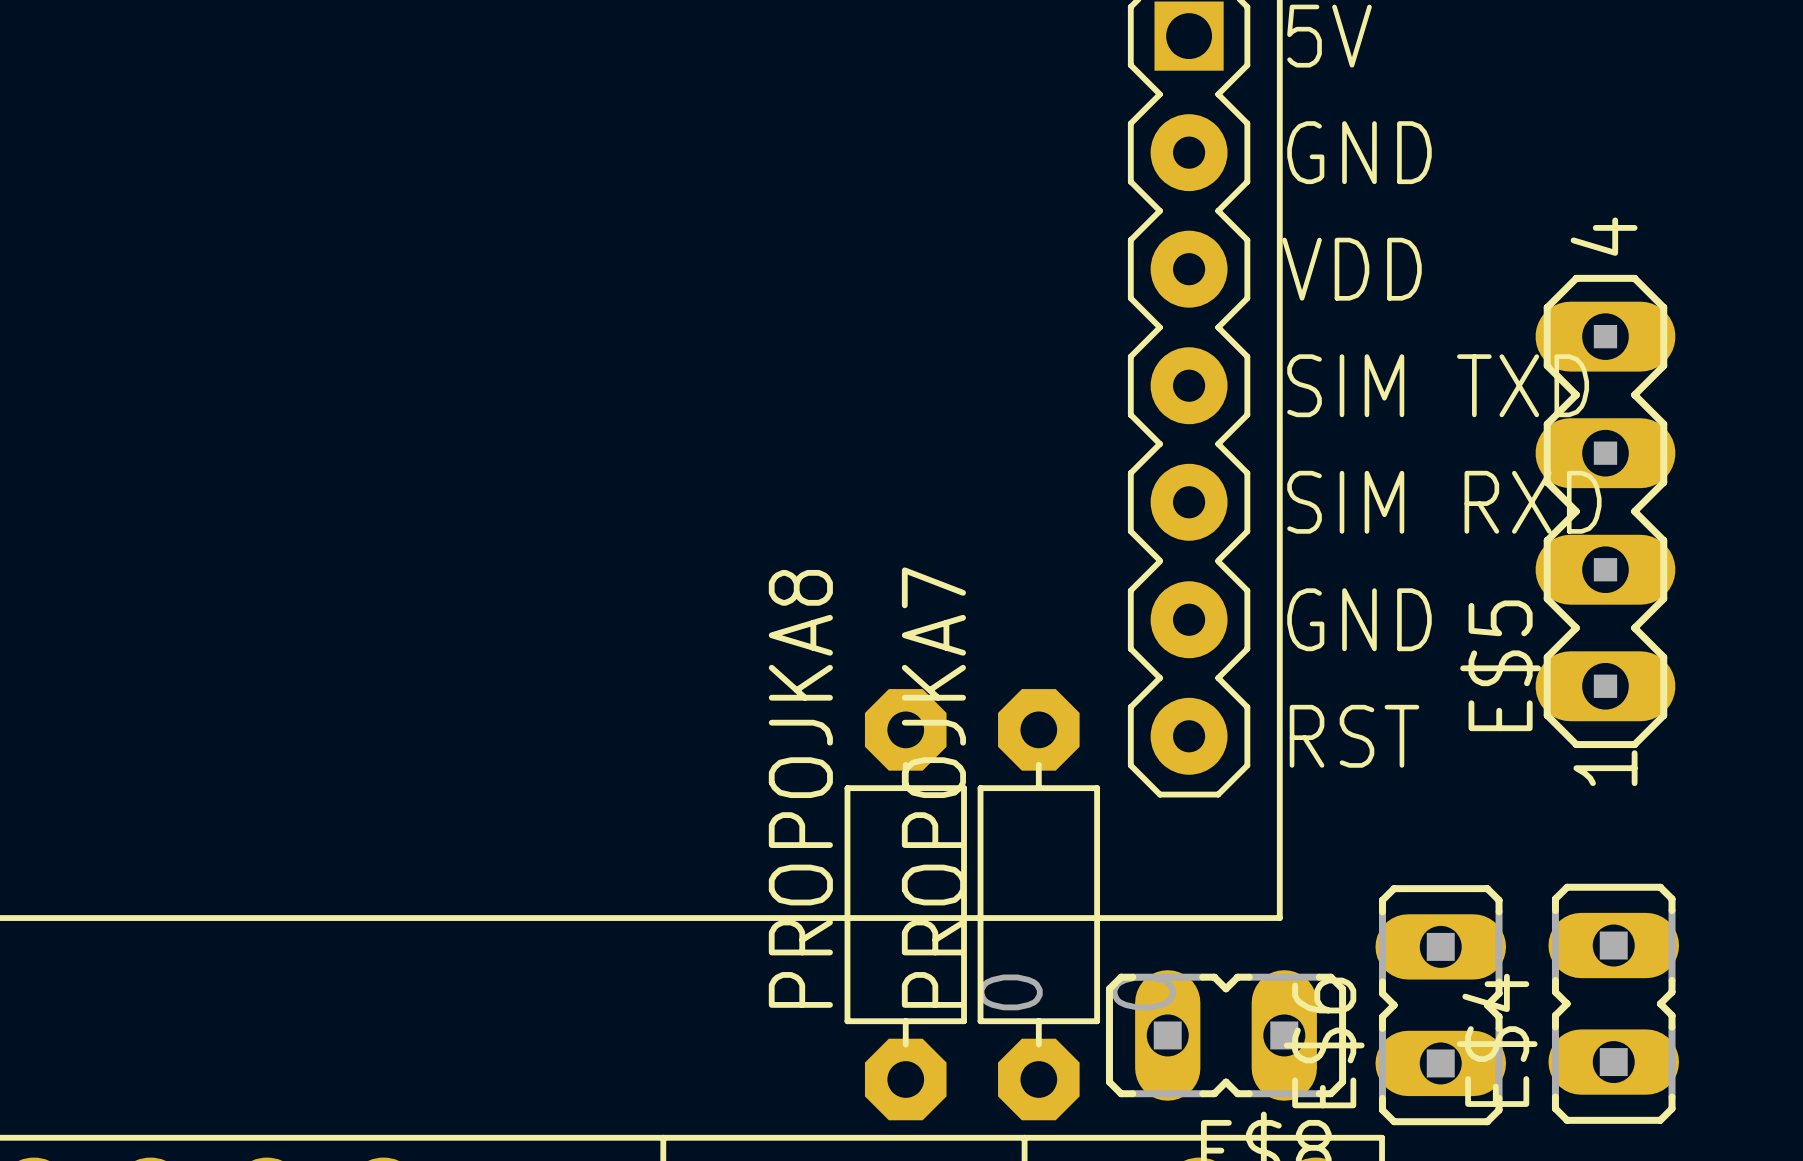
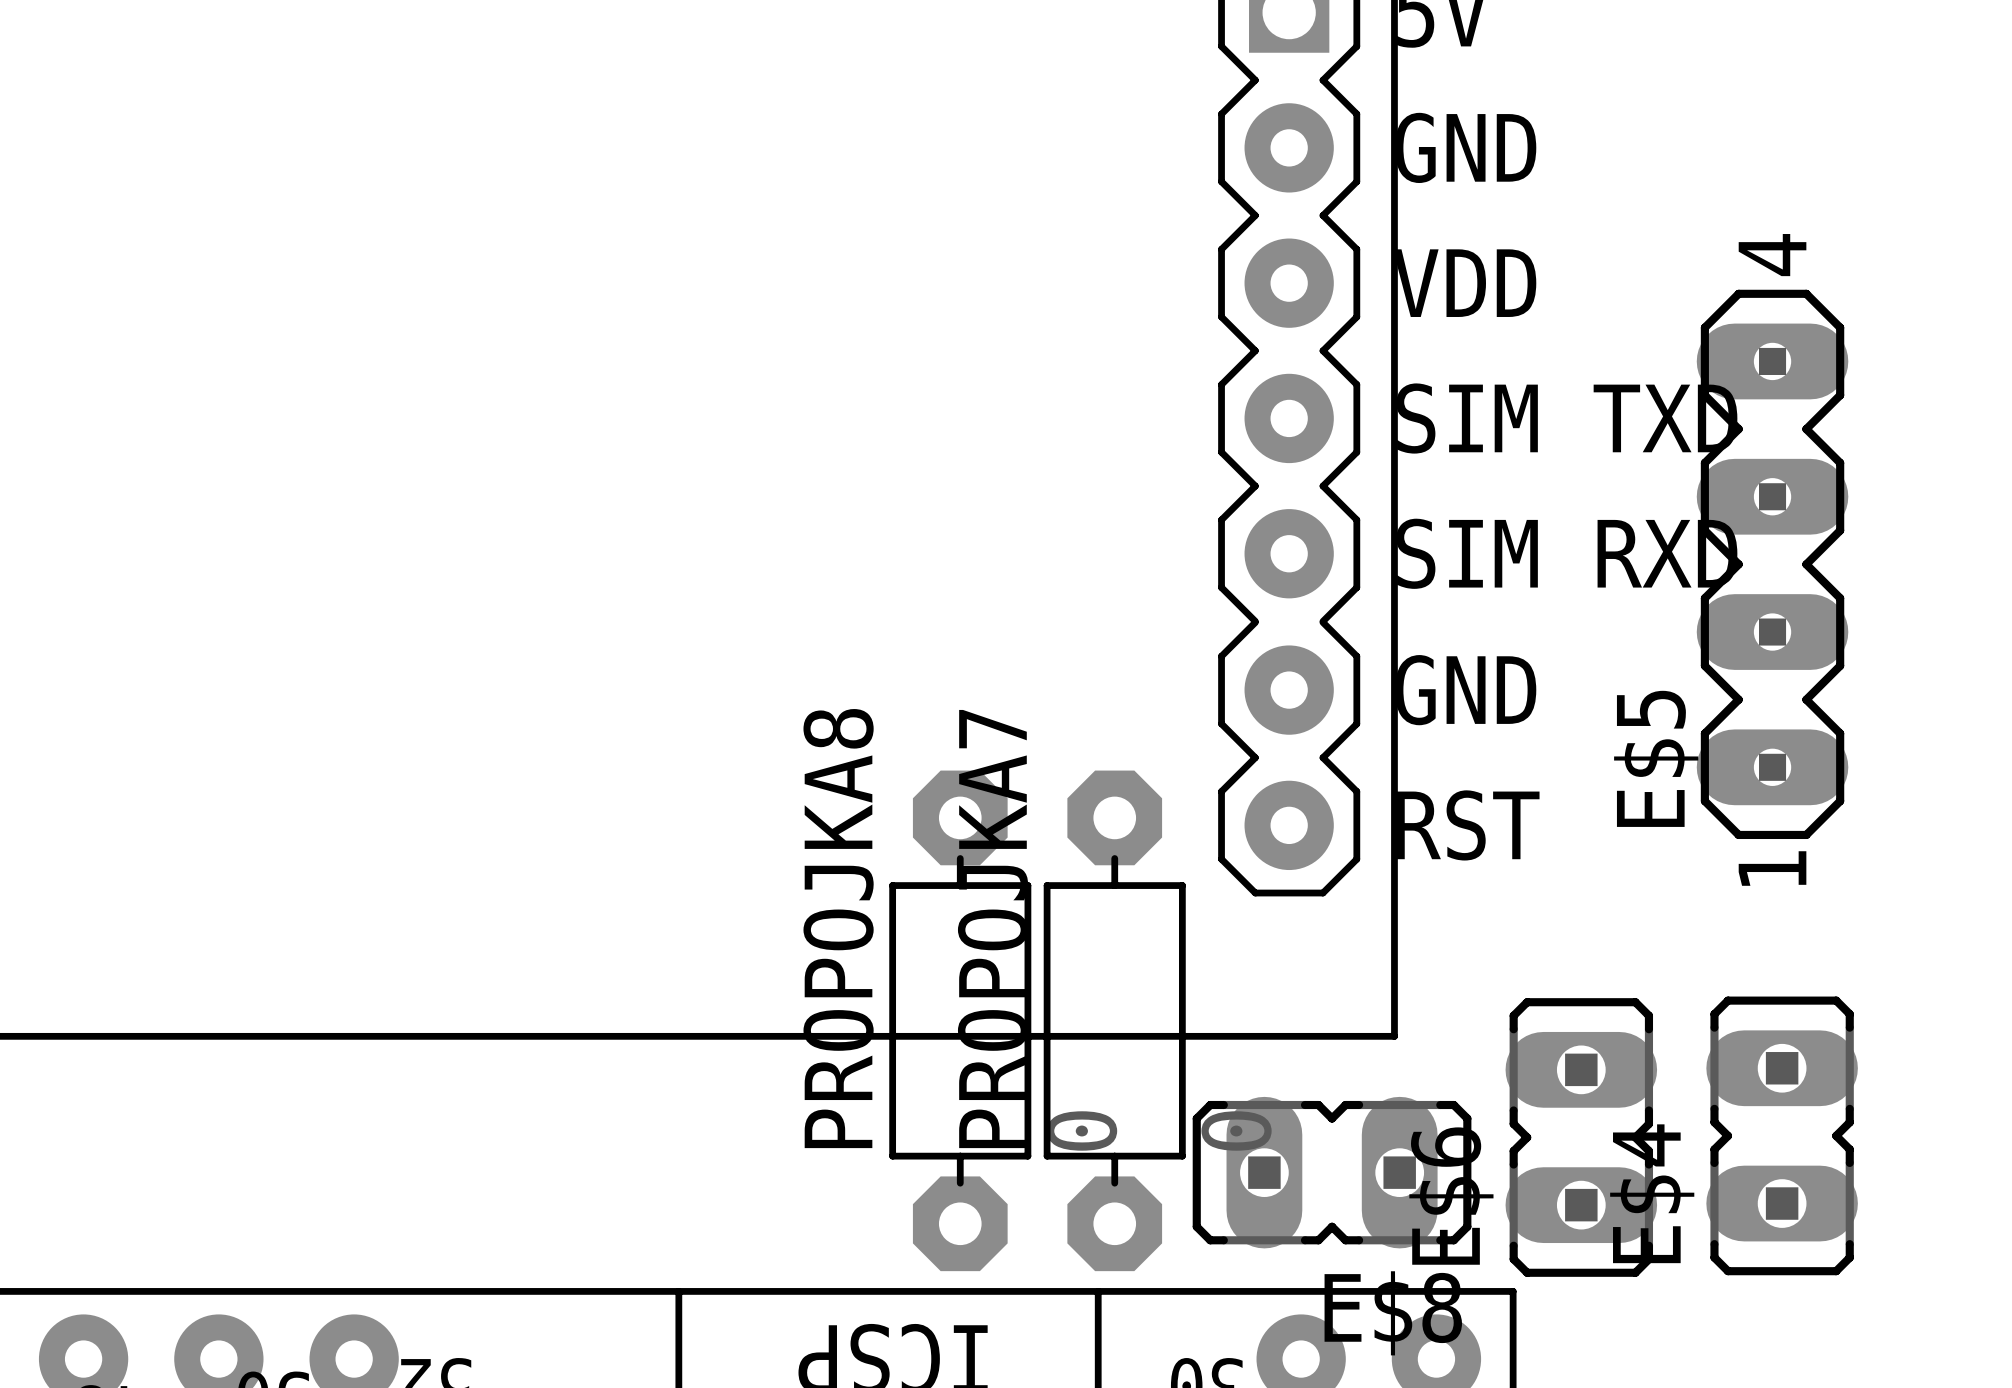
E$5 footprint: [1535, 274, 1676, 749] -> [1696, 289, 1849, 840]

